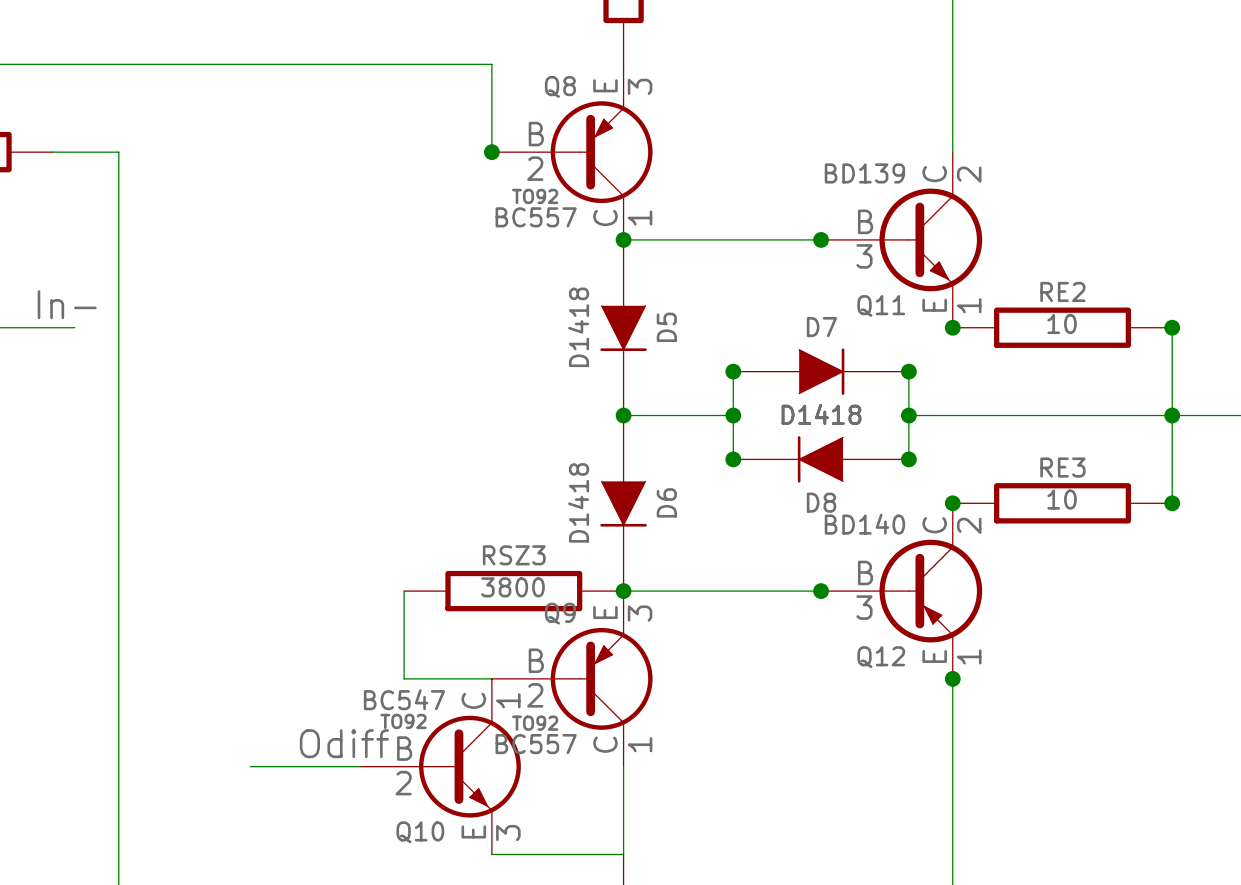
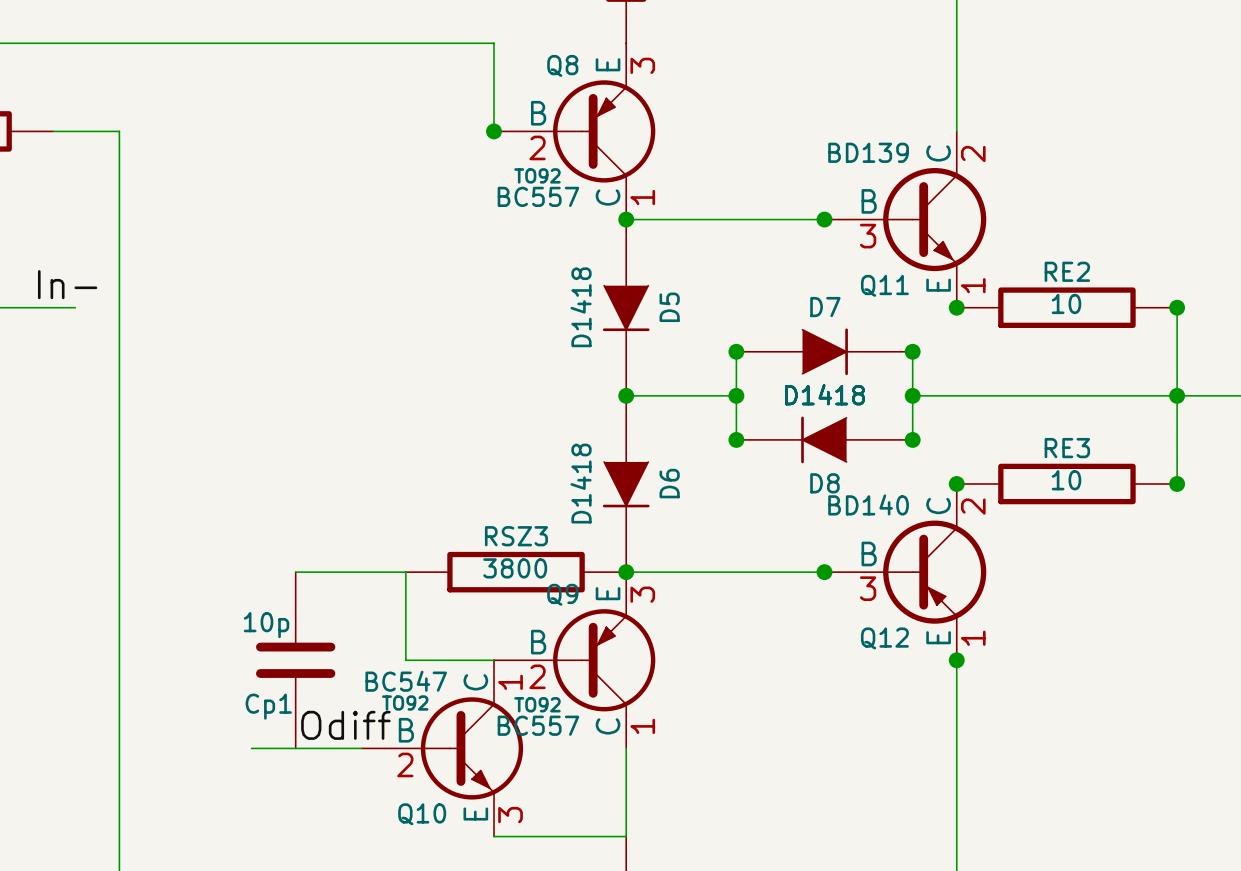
wire: none -> (295, 572) (405, 572)
Cp1: none -> 10p (295, 660)

